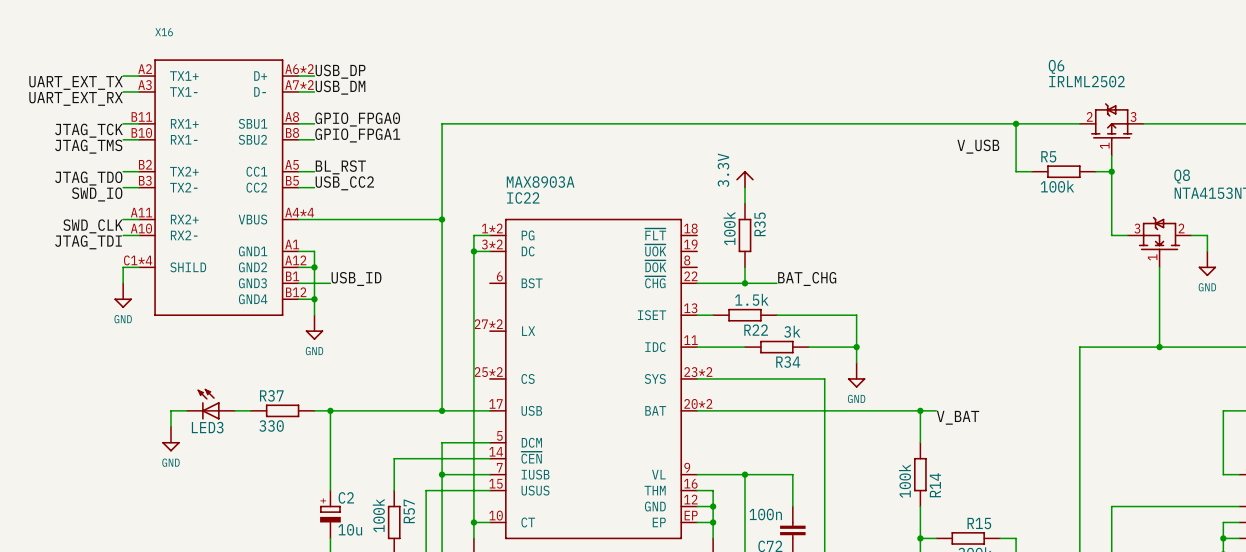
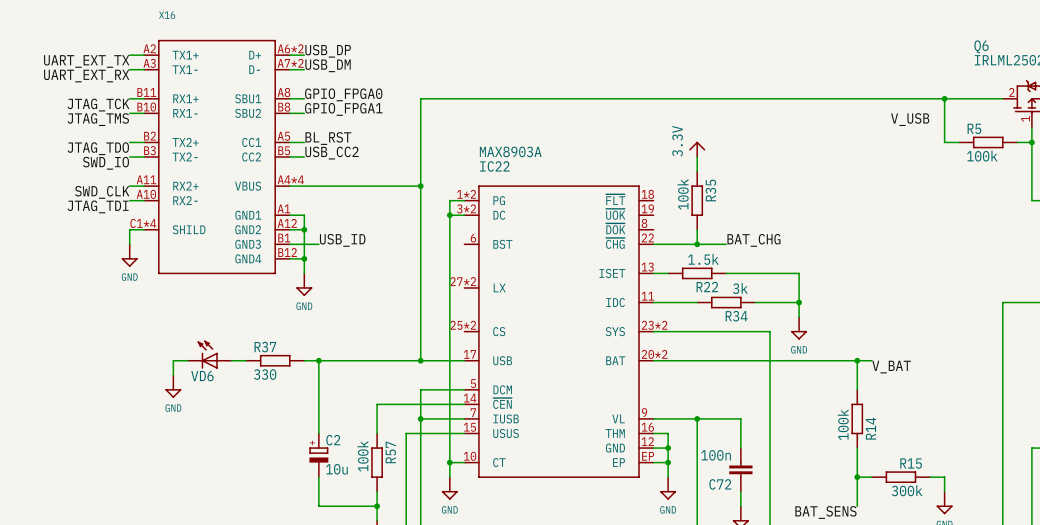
LED3 name: LED3 (207, 427) -> VD6 (202, 376)

